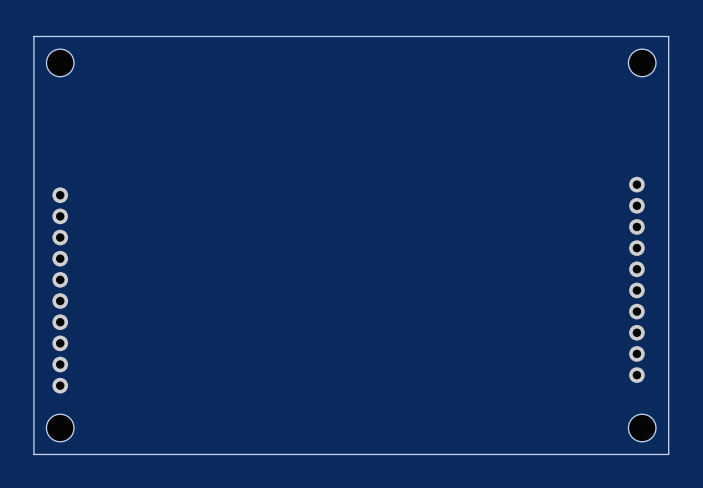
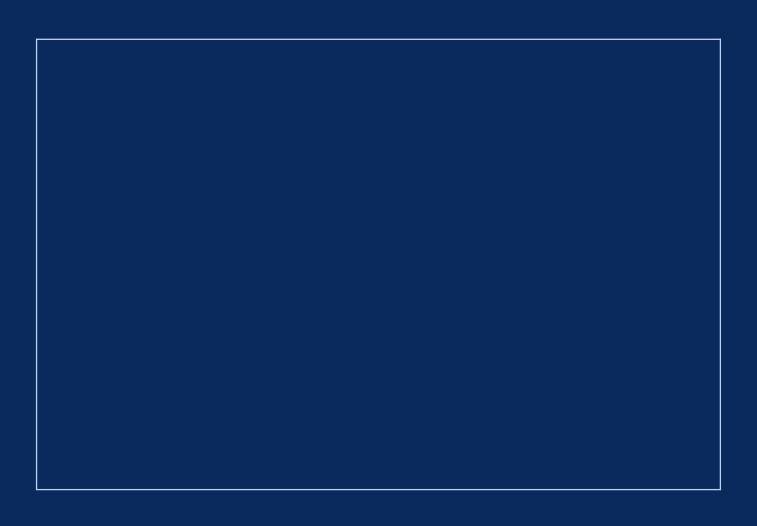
part: (60, 62) -> none
part: (642, 62) -> none
part: (636, 279) -> none
part: (60, 290) -> none
part: (60, 428) -> none
part: (642, 428) -> none

